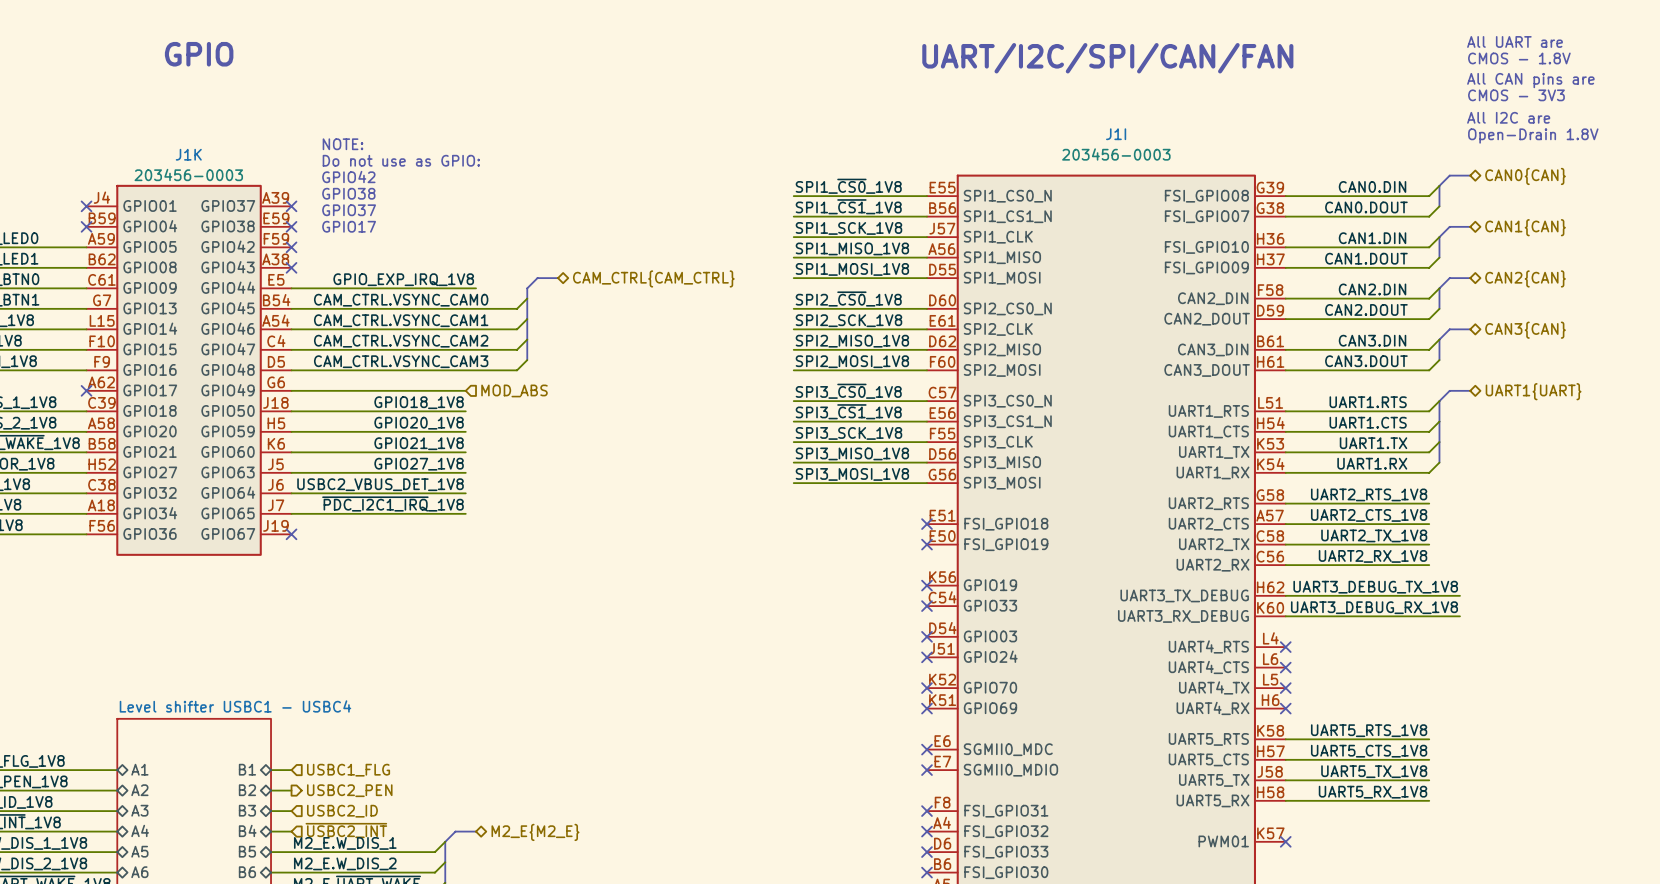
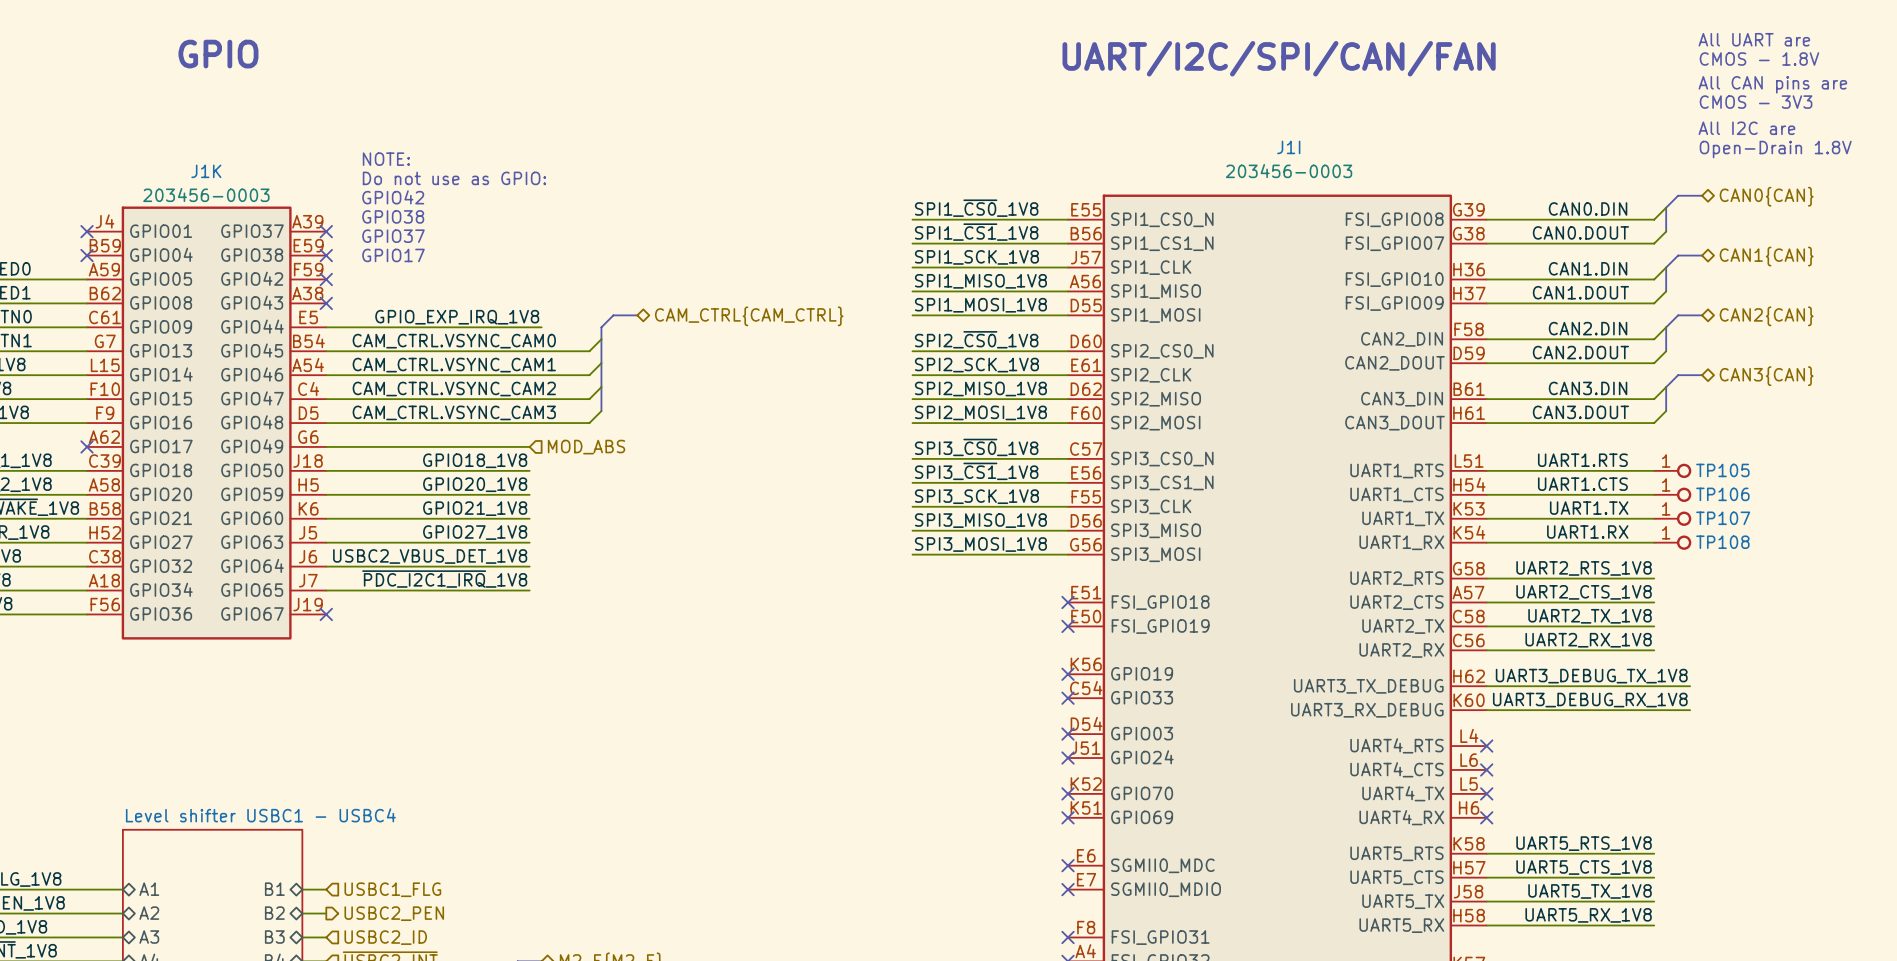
bus: (1470, 390) (1449, 390) (1439, 401) (1439, 462) -> none
hierarchical label: UART1{UART} (1533, 391) -> none
wire: (1439, 401) (1429, 411) -> none
TP105: none -> (1672, 470)
wire: (1439, 421) (1429, 431) -> none
TP106: none -> (1672, 494)
wire: (1439, 442) (1429, 452) -> none
TP107: none -> (1672, 518)
wire: (1439, 462) (1429, 472) -> none
TP108: none -> (1672, 542)

